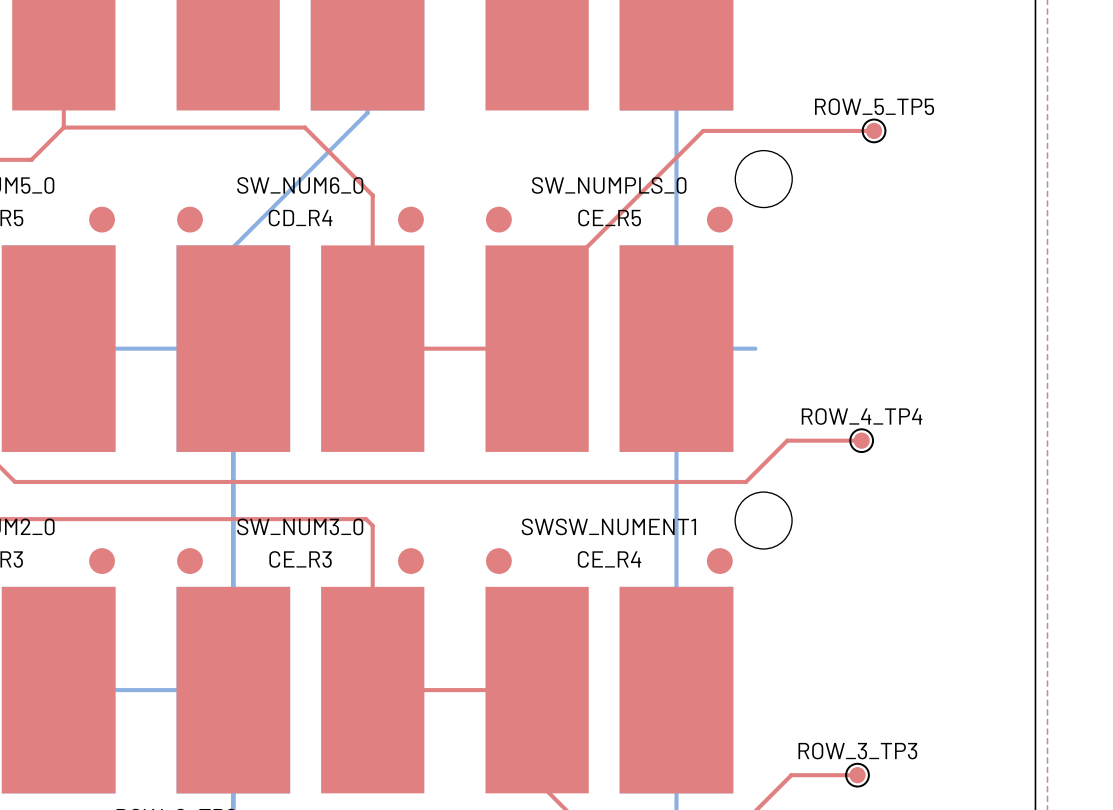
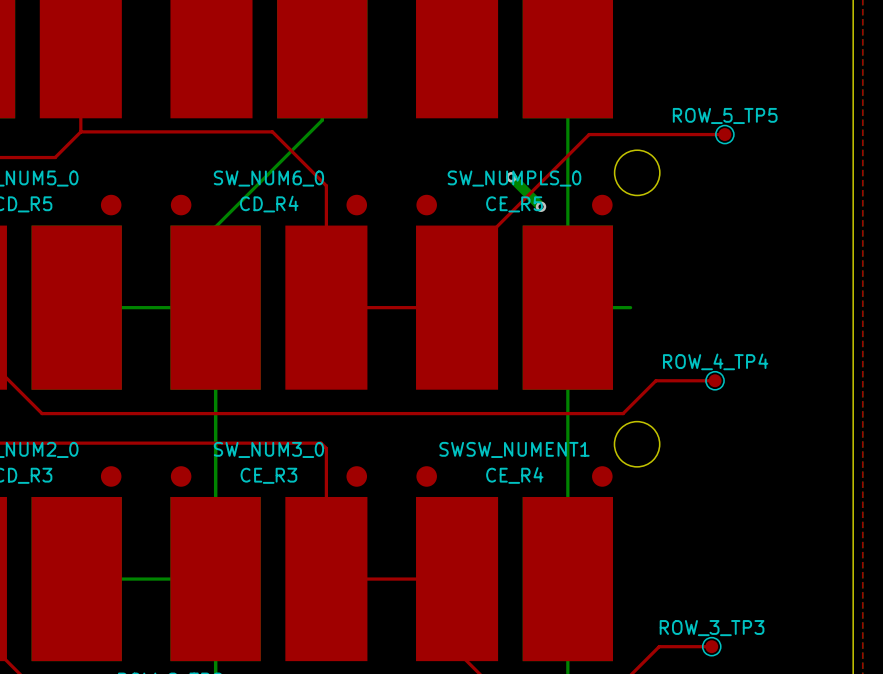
bottom track: none -> (511, 177) (541, 206)
via: none -> (511, 177)
via: none -> (541, 206)

